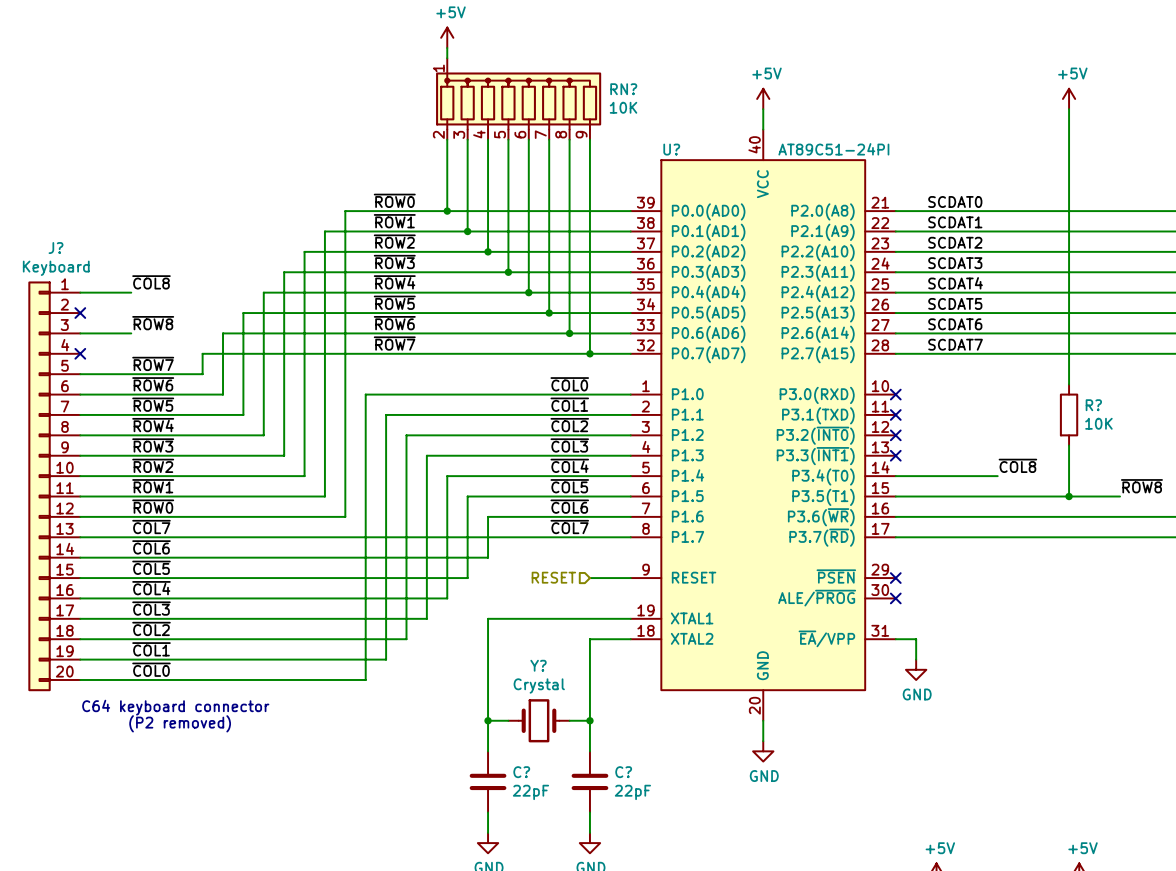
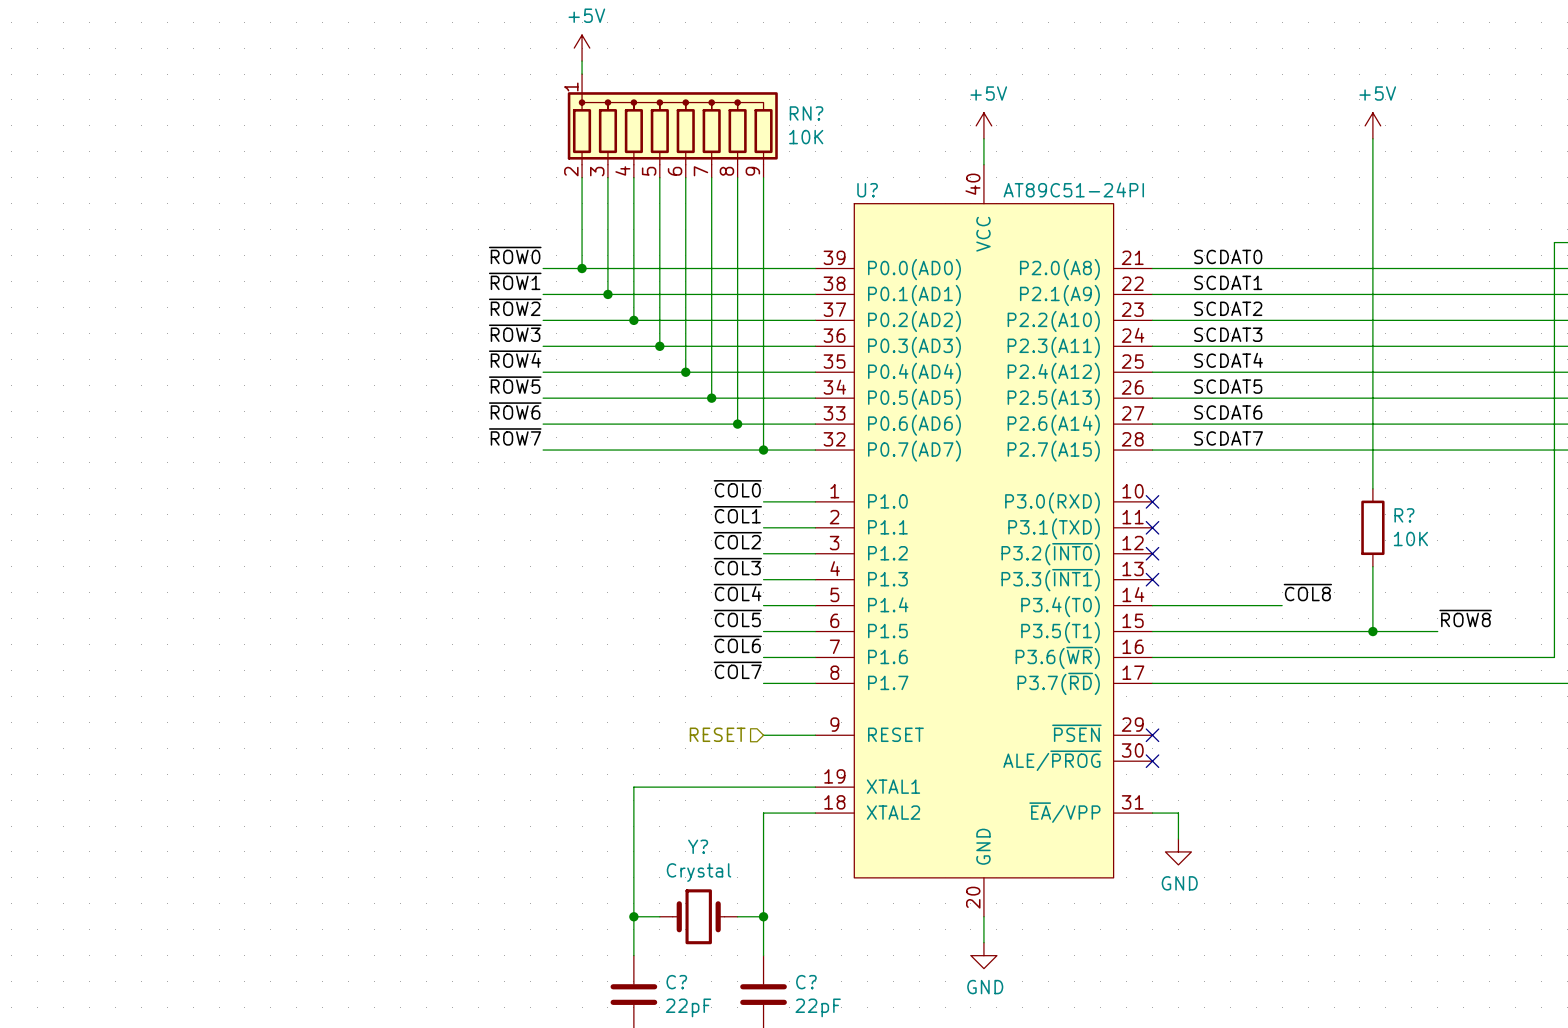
wire: (416, 211) (345, 211) (345, 516) (80, 516) -> none
wire: (416, 231) (324, 231) (324, 496) (80, 496) -> none
wire: (416, 251) (304, 251) (304, 476) (80, 476) -> none
wire: (416, 272) (284, 272) (284, 455) (80, 455) -> none
label: ~{COL8} (151, 282) -> none
wire: (80, 292) (131, 292) -> none
wire: (416, 292) (263, 292) (263, 435) (80, 435) -> none
no-connect mark: (80, 313) -> none
wire: (416, 313) (243, 313) (243, 414) (80, 414) -> none
label: ~{ROW8} (153, 323) -> none
wire: (80, 333) (131, 333) -> none
wire: (416, 333) (223, 333) (223, 394) (80, 394) -> none
no-connect mark: (80, 353) -> none
wire: (416, 353) (202, 353) (202, 374) (80, 374) -> none
label: ~{ROW7} (153, 363) -> none
label: ~{ROW6} (153, 384) -> none
wire: (589, 394) (365, 394) (365, 679) (80, 679) -> none
label: ~{ROW5} (153, 404) -> none
wire: (589, 414) (386, 414) (386, 659) (80, 659) -> none
label: ~{ROW4} (153, 425) -> none
wire: (589, 435) (406, 435) (406, 639) (80, 639) -> none
label: ~{ROW3} (153, 445) -> none
wire: (589, 455) (426, 455) (426, 618) (80, 618) -> none
label: ~{ROW2} (153, 465) -> none
wire: (589, 476) (447, 476) (447, 598) (80, 598) -> none
J?: Keyboard (54, 486) -> none
label: ~{ROW1} (153, 486) -> none
wire: (589, 496) (467, 496) (467, 578) (80, 578) -> none
label: ~{ROW0} (153, 506) -> none
wire: (589, 516) (488, 516) (488, 557) (80, 557) -> none
label: ~{COL7} (151, 527) -> none
wire: (80, 537) (589, 537) -> none
label: ~{COL6} (151, 547) -> none
label: ~{COL5} (151, 567) -> none
label: ~{COL4} (151, 588) -> none
label: ~{COL3} (151, 608) -> none
label: ~{COL2} (151, 628) -> none
label: ~{COL1} (151, 649) -> none
label: ~{COL0} (151, 669) -> none
text: C64 keyboard connector (175, 707) -> none
text: (P2 removed) (180, 723) -> none

